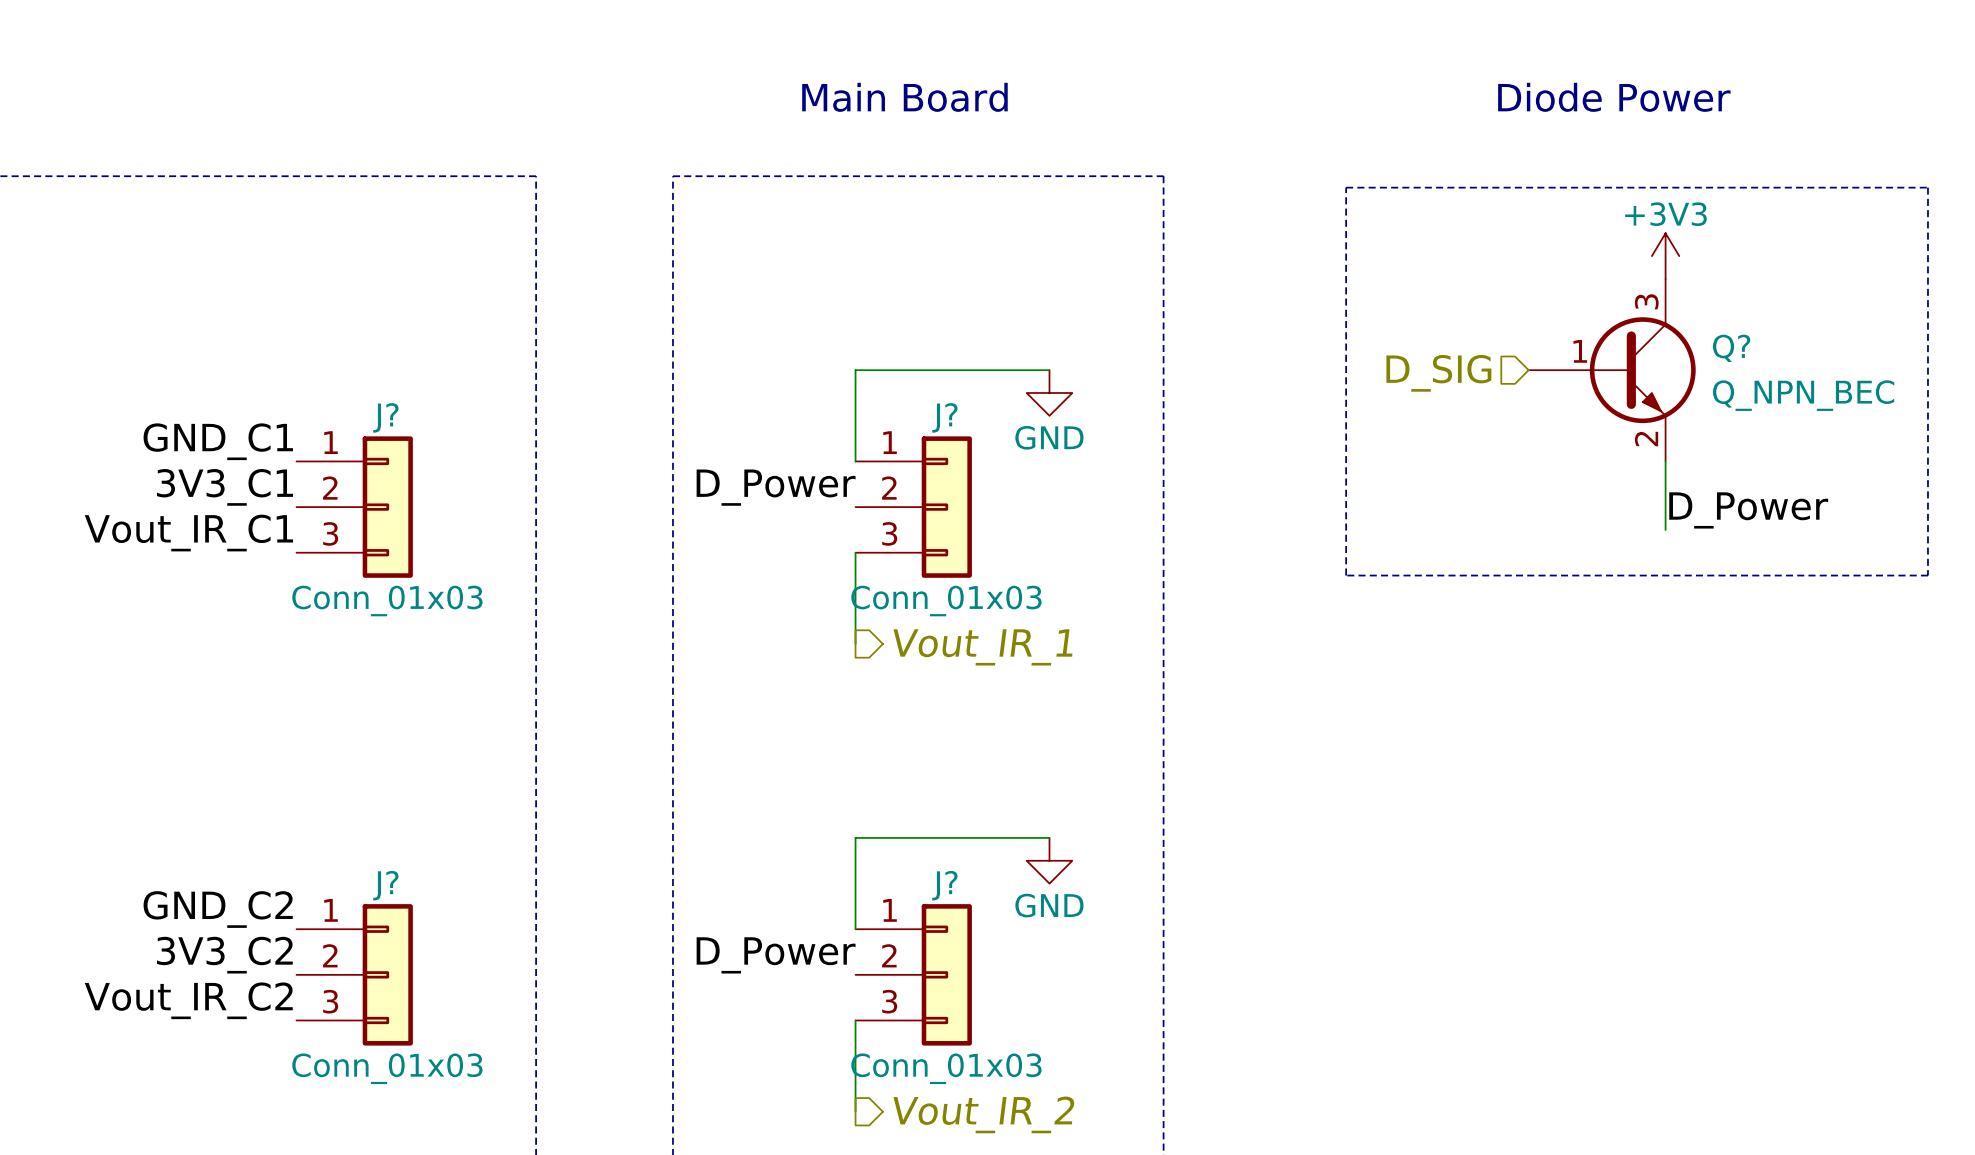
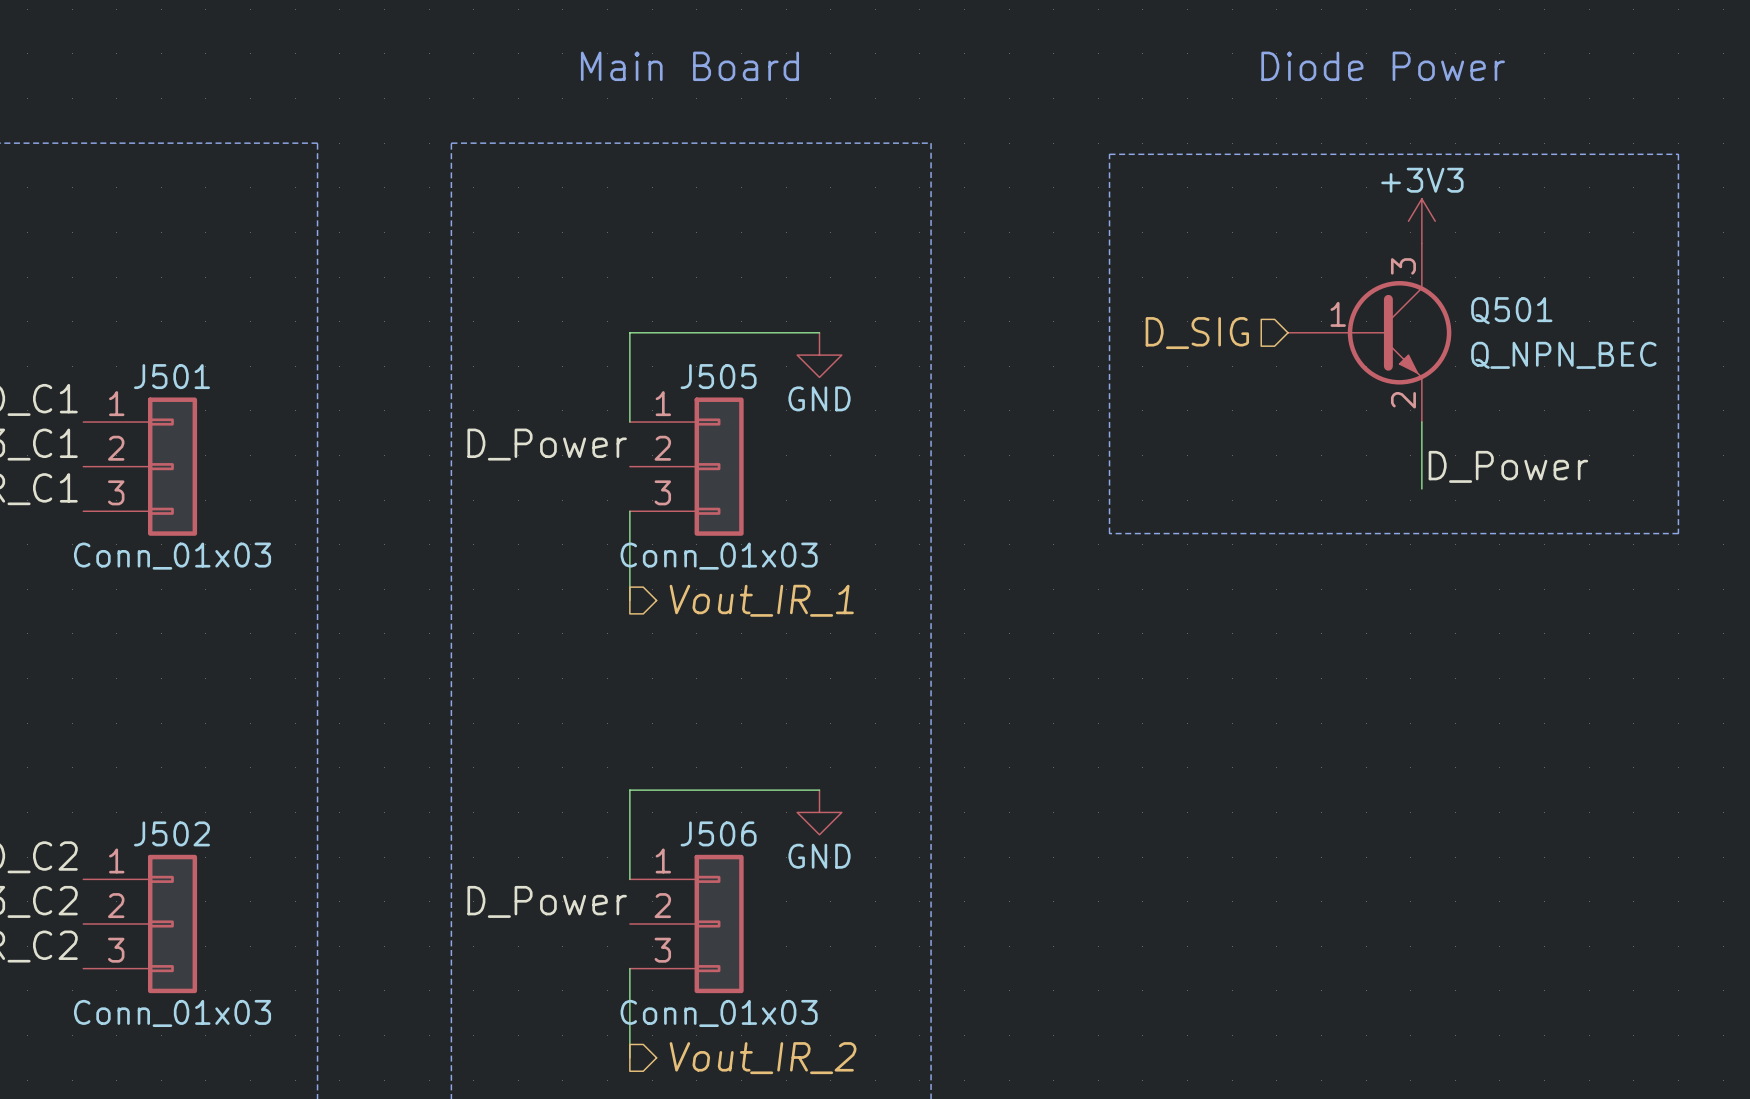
Q? name: Q? (1731, 348) -> Q501 (1511, 310)
J? name: J? (385, 417) -> J501 (171, 376)
J? name: J? (944, 417) -> J505 (718, 376)
J? name: J? (385, 885) -> J502 (171, 833)
J? name: J? (944, 885) -> J506 (718, 833)

